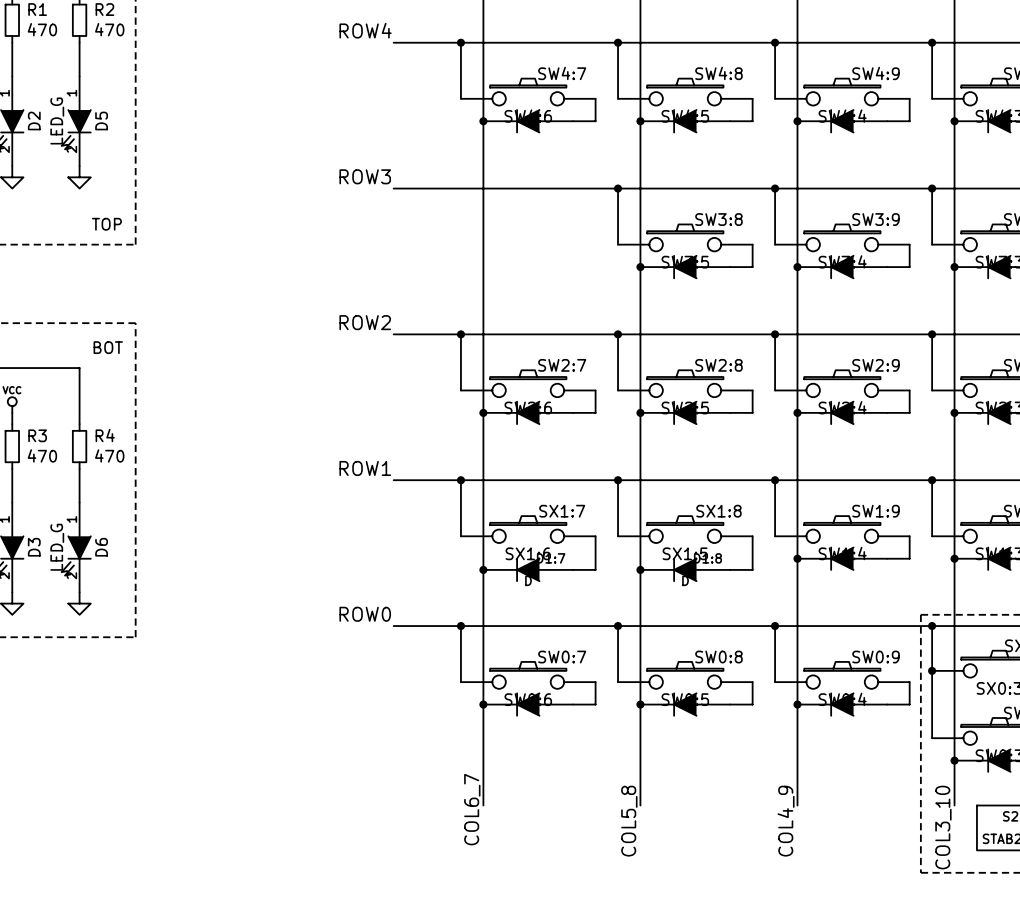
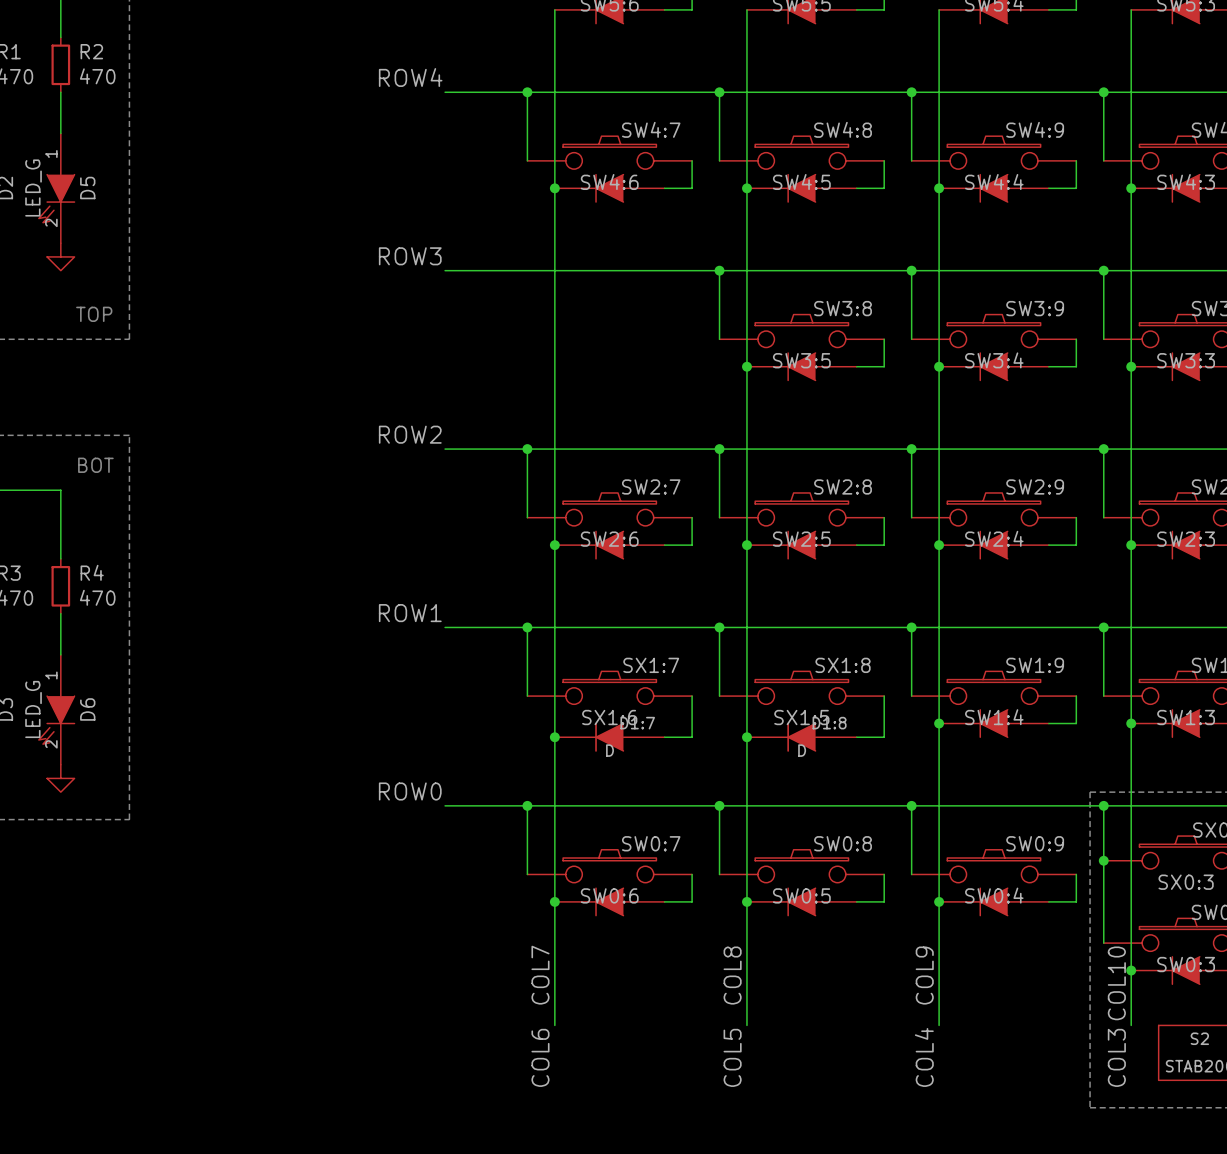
label: none -> COL7 (540, 975)
label: none -> COL8 (732, 975)
label: none -> COL9 (924, 975)
label: none -> COL10 (1116, 983)
label: COL6_7 (472, 809) -> none
label: COL5_8 (629, 821) -> none
label: COL4_9 (786, 821) -> none
label: COL3_10 (943, 827) -> none
label: none -> COL4 (924, 1057)
label: none -> COL6 (540, 1057)
label: none -> COL5 (732, 1057)
label: none -> COL3 (1116, 1057)

